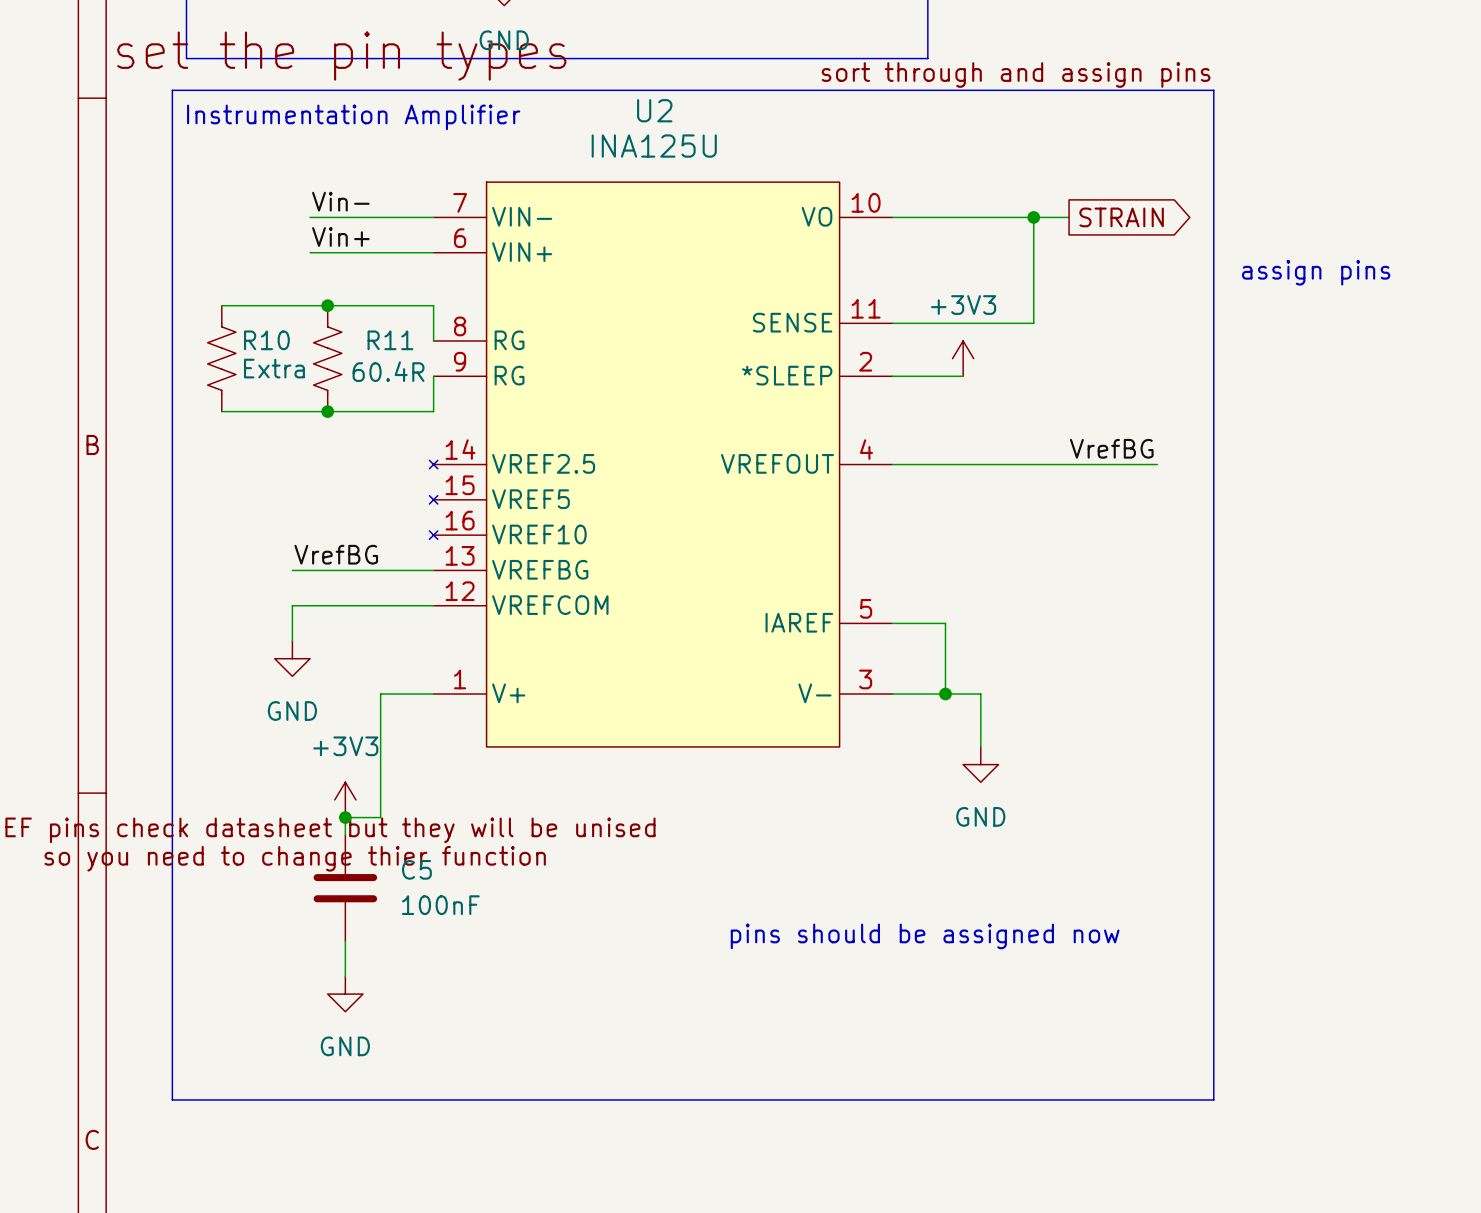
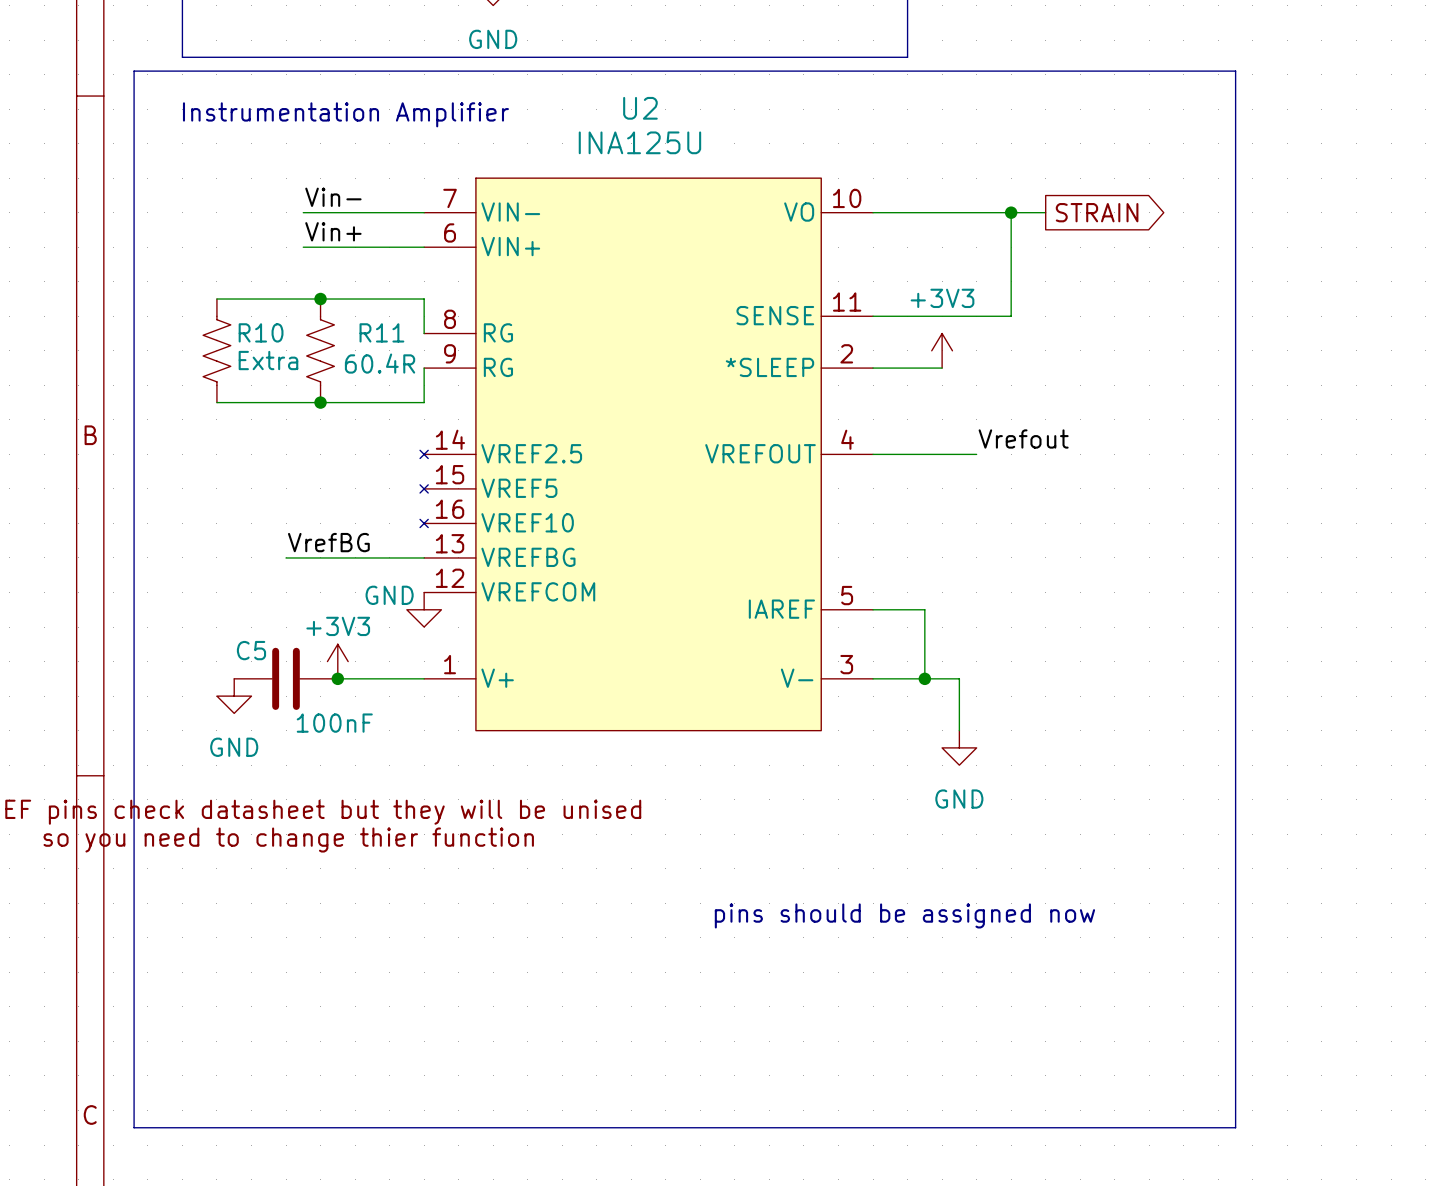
U2 text: set the pin types (341, 56) -> none
U2 text: sort through and assign pins (1016, 74) -> none
line: (172, 90) (1213, 90) (1213, 1099) (172, 1099) (172, 90) -> (134, 71) (134, 1127) (1235, 1127) (1235, 71) (134, 71)
text: assign pins (1316, 272) -> none
label: VrefBG (1111, 448) -> Vrefout (1023, 438)
wire: (998, 464) (1157, 464) -> none
wire: (433, 605) (292, 605) (292, 641) -> none
power symbol: none -> GND (424, 609)
power symbol: GND (292, 658) -> none
junction: none -> (337, 678)
wire: (380, 694) (380, 817) (345, 817) (345, 835) -> (372, 678) (337, 678)
power symbol: none -> GND (234, 696)
power symbol text position: +3V3 (345, 746) -> +3V3 (338, 626)
power symbol position: +3V3 (345, 799) -> +3V3 (337, 661)
junction: (345, 817) -> none
C5 name position: C5 (416, 869) -> C5 (251, 650)
C5 rotation: 0° (345, 888) -> 90° clockwise (286, 678)
C5 position: (345, 888) -> (286, 678)
C5 value position: 100nF (440, 905) -> 100nF (334, 723)
wire: (345, 941) (345, 976) -> none
power symbol: GND (345, 994) -> none

